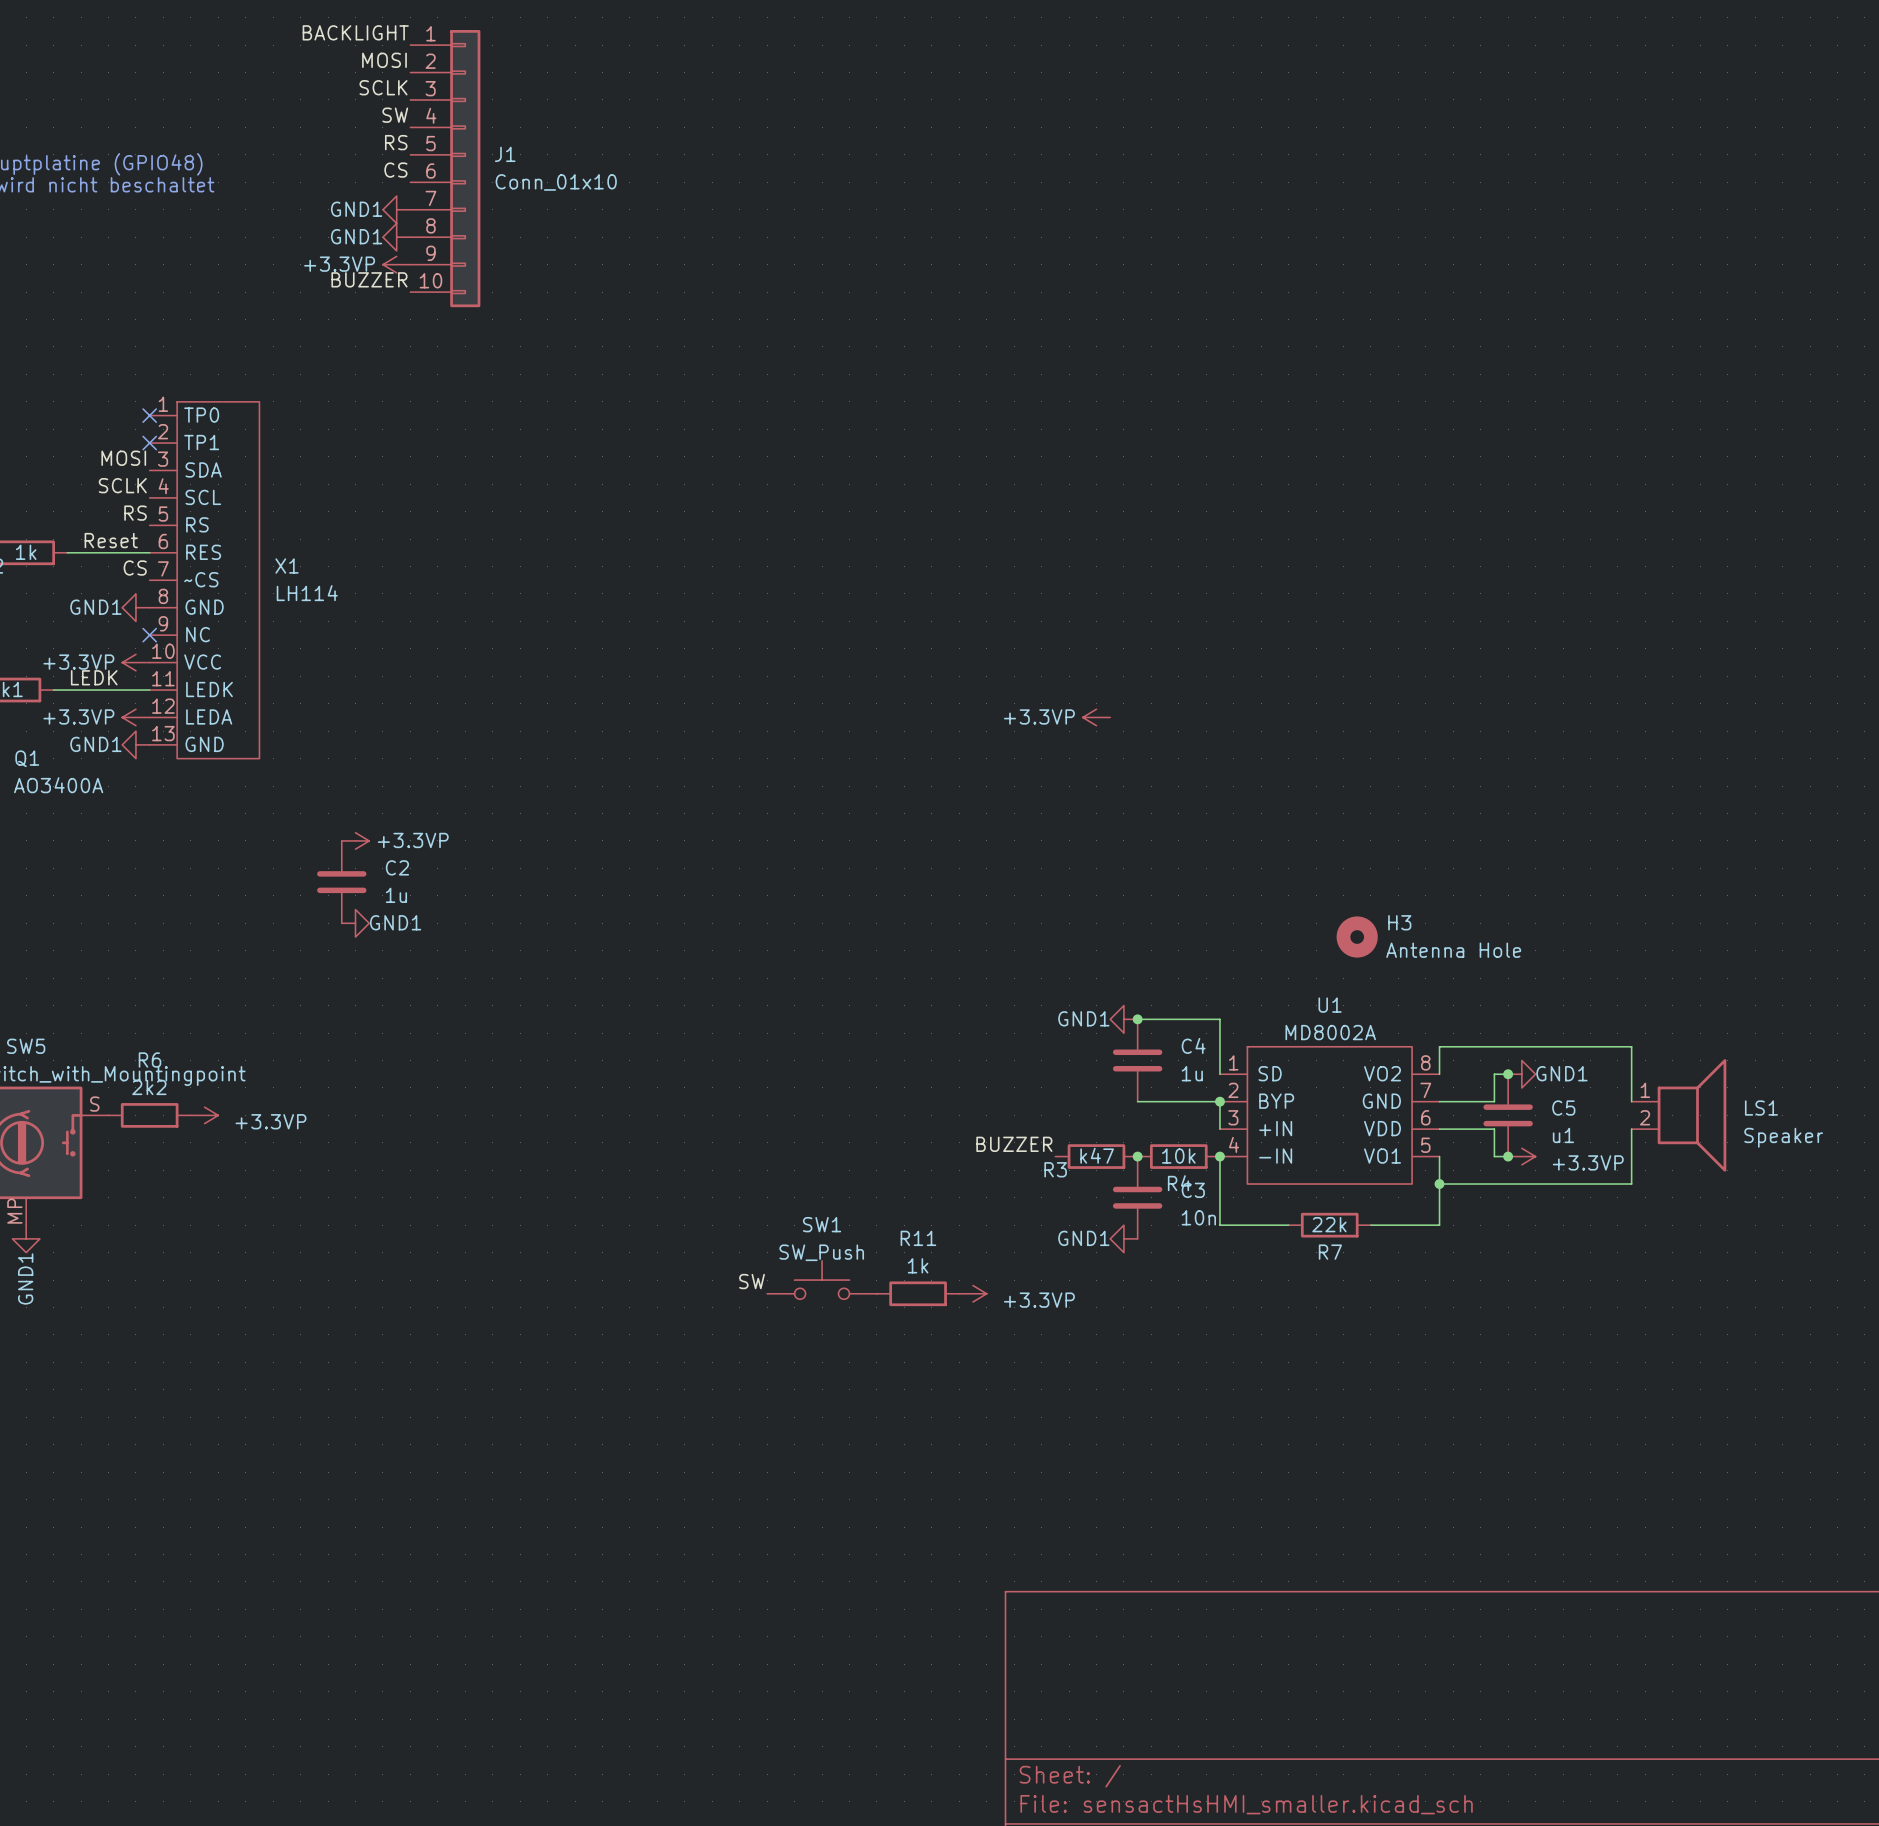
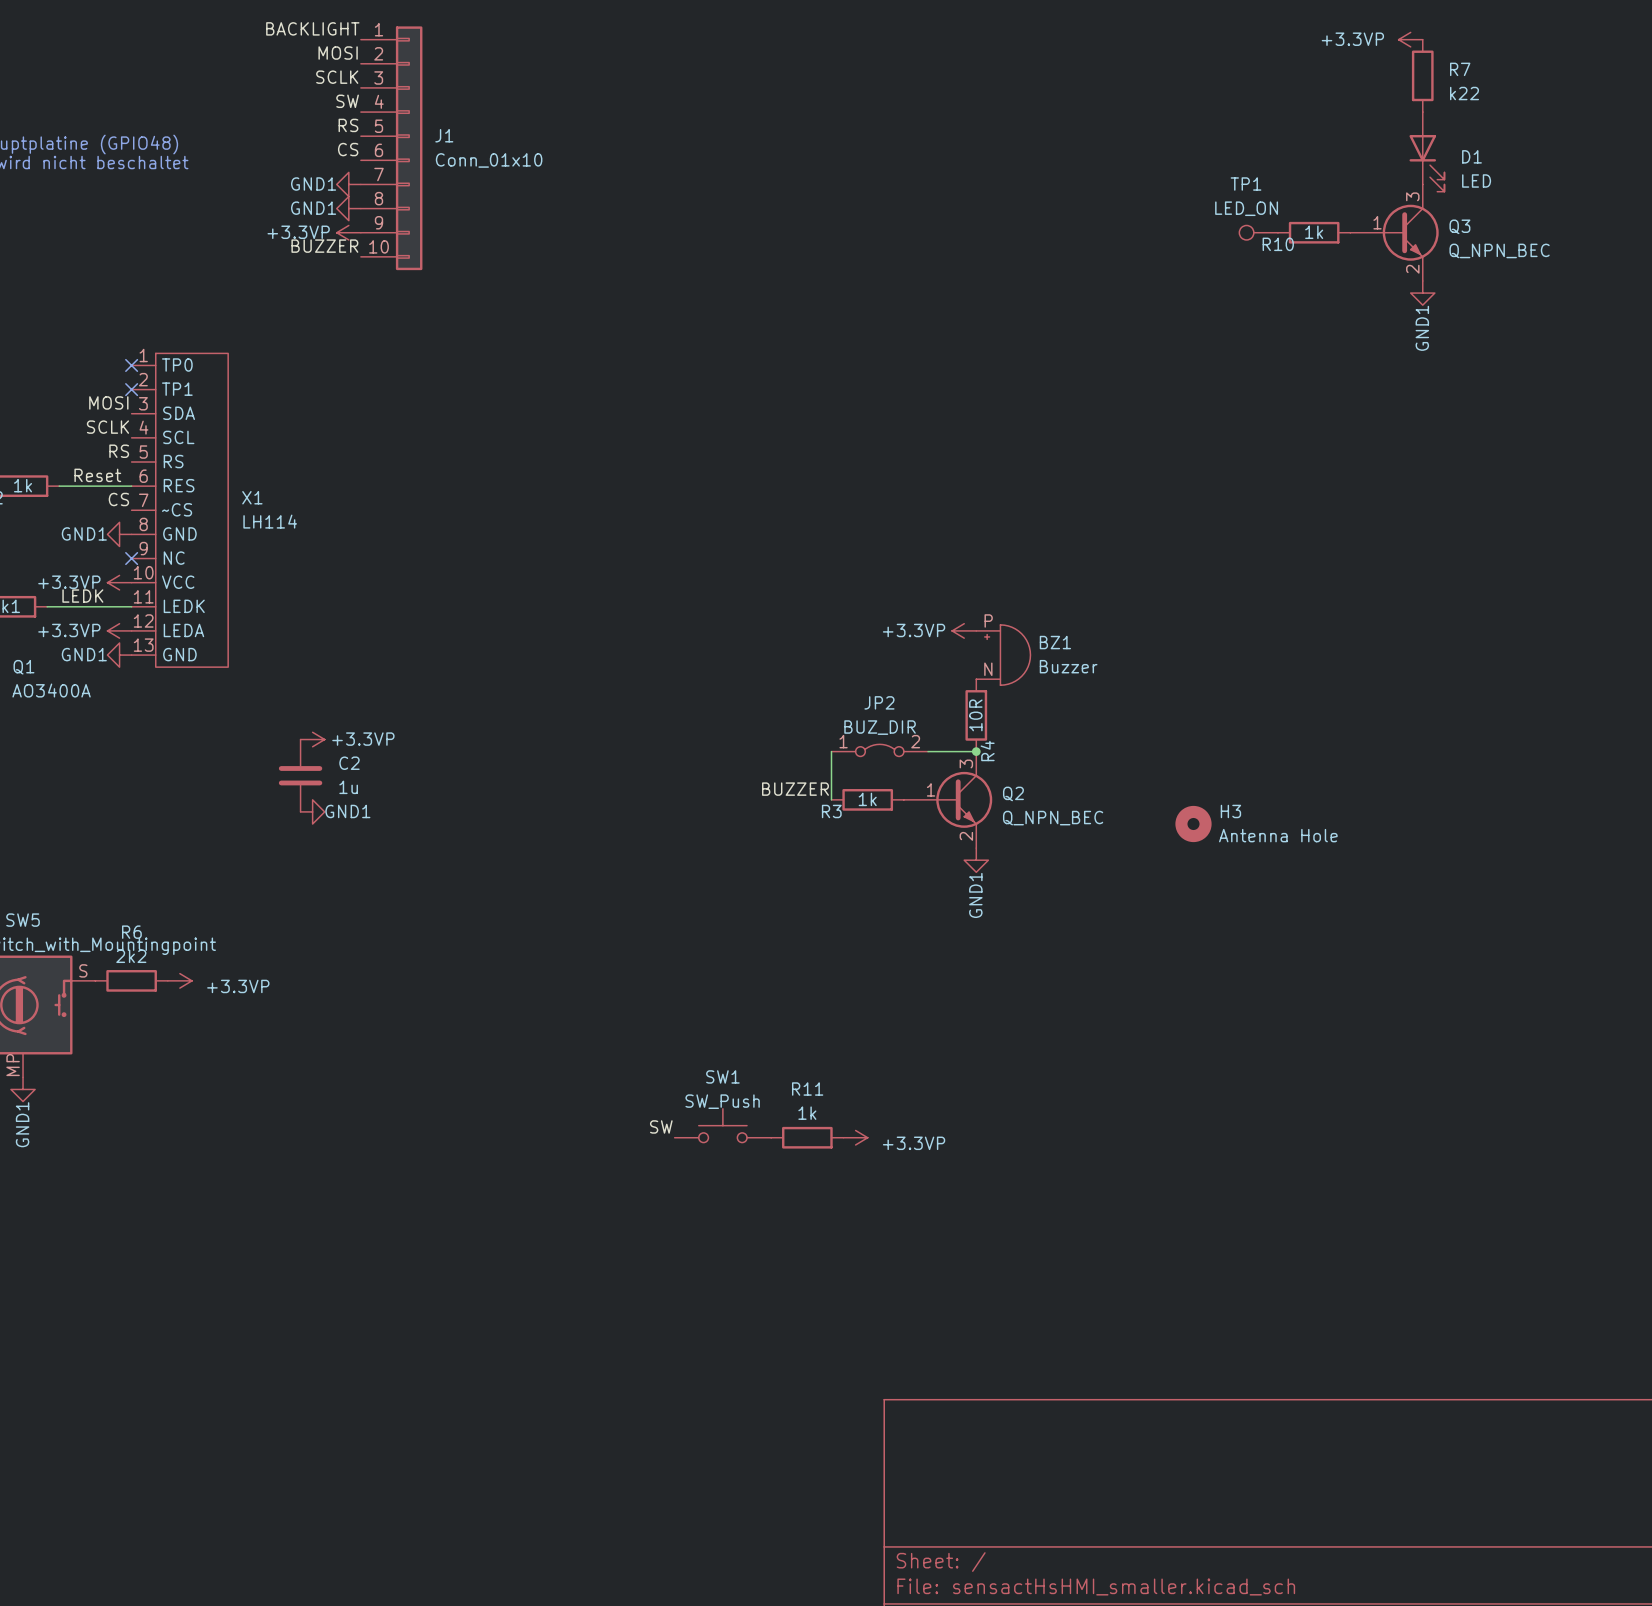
power symbol: none -> +3.3VP (1410, 39)
D1: none -> LED (1426, 151)
TP1: none -> LED_ON (1258, 232)
R10: none -> 1k (1314, 232)
Q3: none -> Q_NPN_BEC (1394, 232)
power symbol: none -> GND1 (1422, 293)
BZ1: none -> Buzzer (1003, 655)
JP2: none -> BUZ_DIR (879, 750)
wire: none -> (831, 751) (831, 799)
wire: none -> (928, 751) (976, 751)
junction: none -> (976, 751)
label: none -> BUZZER (795, 789)
Q2: none -> Q_NPN_BEC (948, 799)
power symbol rotation: 0° (1123, 1019) -> 90° counterclockwise (976, 860)
power symbol position: GND1 (1123, 1019) -> GND1 (976, 860)
wire: (1137, 1019) (1219, 1019) (1219, 1074) -> none
junction: (1137, 1019) -> none
C4: 1u (1137, 1060) -> none
wire: (1439, 1074) (1439, 1046) (1631, 1046) (1631, 1101) -> none
wire: (1508, 1074) (1494, 1074) (1494, 1101) (1439, 1101) -> none
junction: (1508, 1074) -> none
power symbol: GND1 (1521, 1074) -> none
wire: (1137, 1101) (1219, 1101) (1219, 1129) -> none
junction: (1219, 1101) -> none
U1: MD8002A (1329, 1115) -> none
C5: u1 (1508, 1115) -> none
LS1: Speaker (1678, 1115) -> none
wire: (1439, 1129) (1494, 1129) (1494, 1156) (1508, 1156) -> none
wire: (1631, 1129) (1631, 1184) (1439, 1184) -> none
label: BUZZER (1014, 1144) -> none
R3 value: k47 (1097, 1155) -> 1k (867, 799)
R3 position: (1096, 1156) -> (867, 799)
junction: (1137, 1156) -> none
R4 rotation: 0° (1178, 1156) -> 90° clockwise (976, 715)
R4 position: (1178, 1156) -> (976, 715)
R4 value: 10k (1178, 1156) -> 10R (975, 715)
wire: (1219, 1156) (1219, 1225) (1288, 1225) -> none
junction: (1219, 1156) -> none
wire: (1439, 1156) (1439, 1225) (1370, 1225) -> none
junction: (1508, 1156) -> none
power symbol: +3.3VP (1521, 1156) -> none
junction: (1439, 1184) -> none
C3: 10n (1137, 1197) -> none
R7 value: 22k (1329, 1224) -> k22 (1464, 93)
R7 rotation: 0° (1329, 1225) -> 90° clockwise (1422, 75)
R7 position: (1329, 1225) -> (1422, 75)
power symbol: GND1 (1123, 1238) -> none
R7 name position: R7 (1330, 1252) -> R7 (1460, 69)

